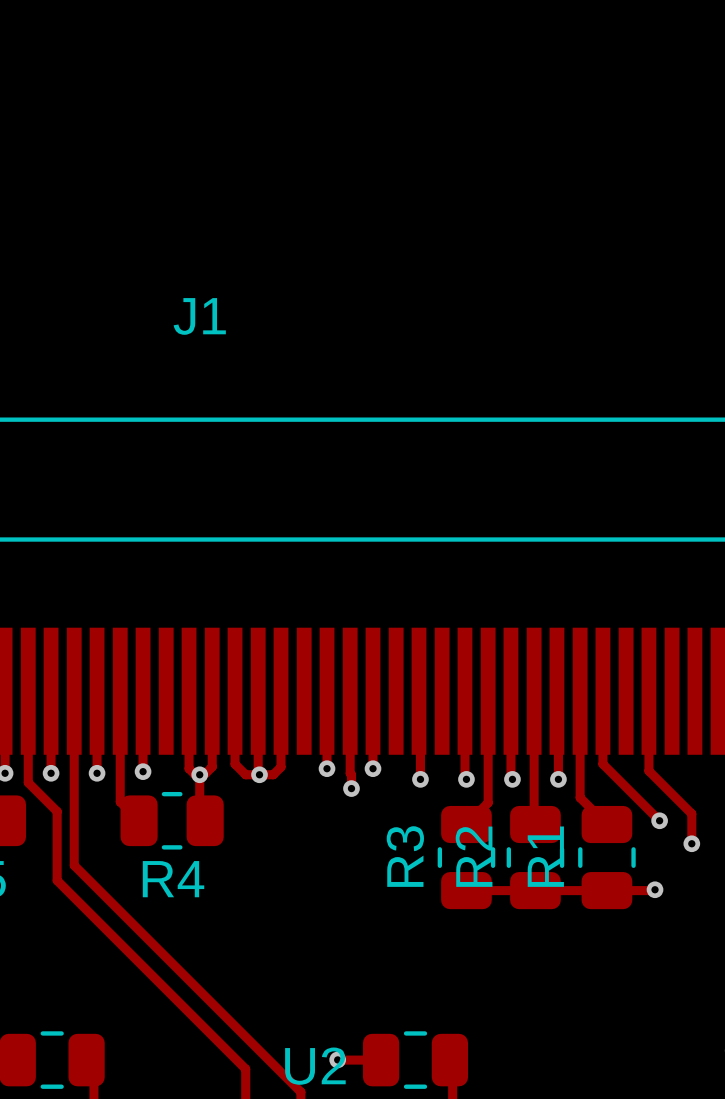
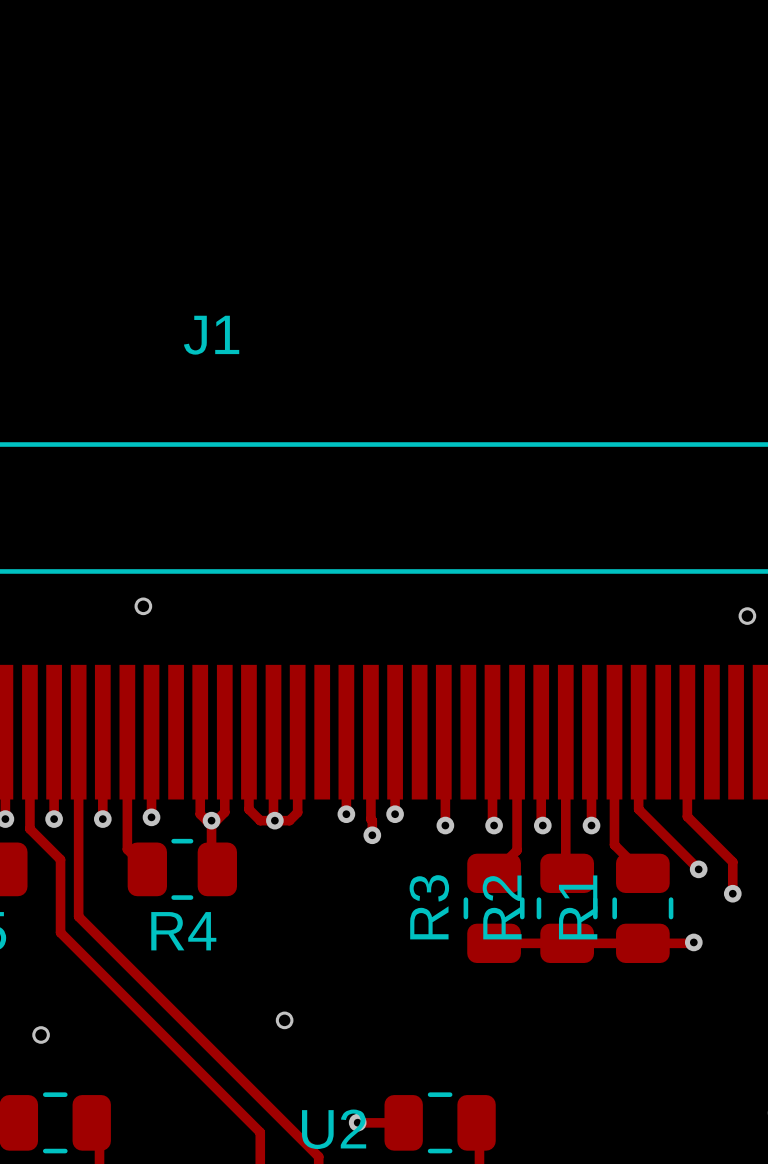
via: none -> (143, 606)
via: none -> (747, 616)
via: none -> (284, 1020)
via: none -> (41, 1034)

